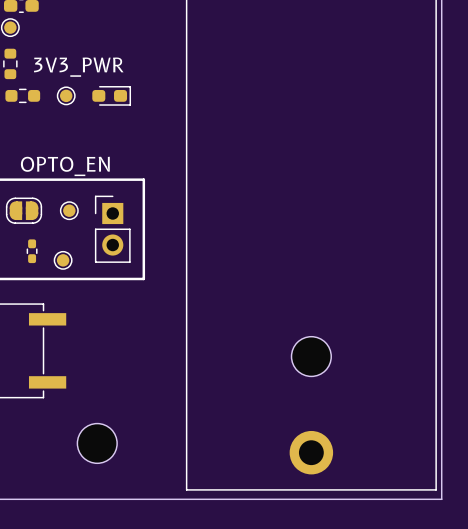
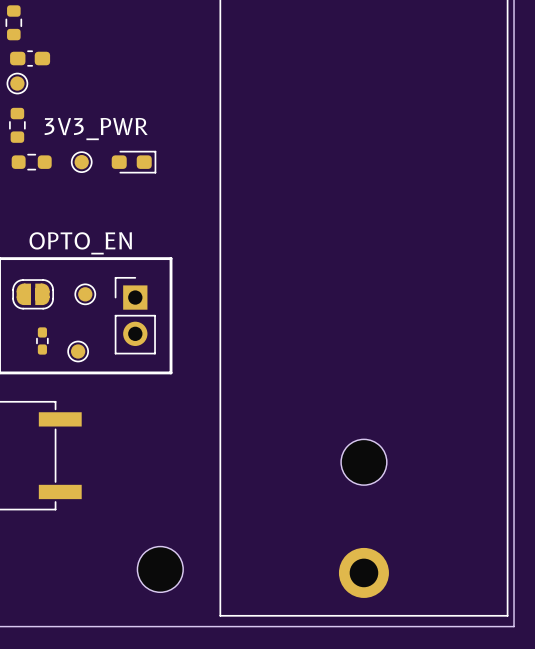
part position: (97, 443) -> (160, 569)

